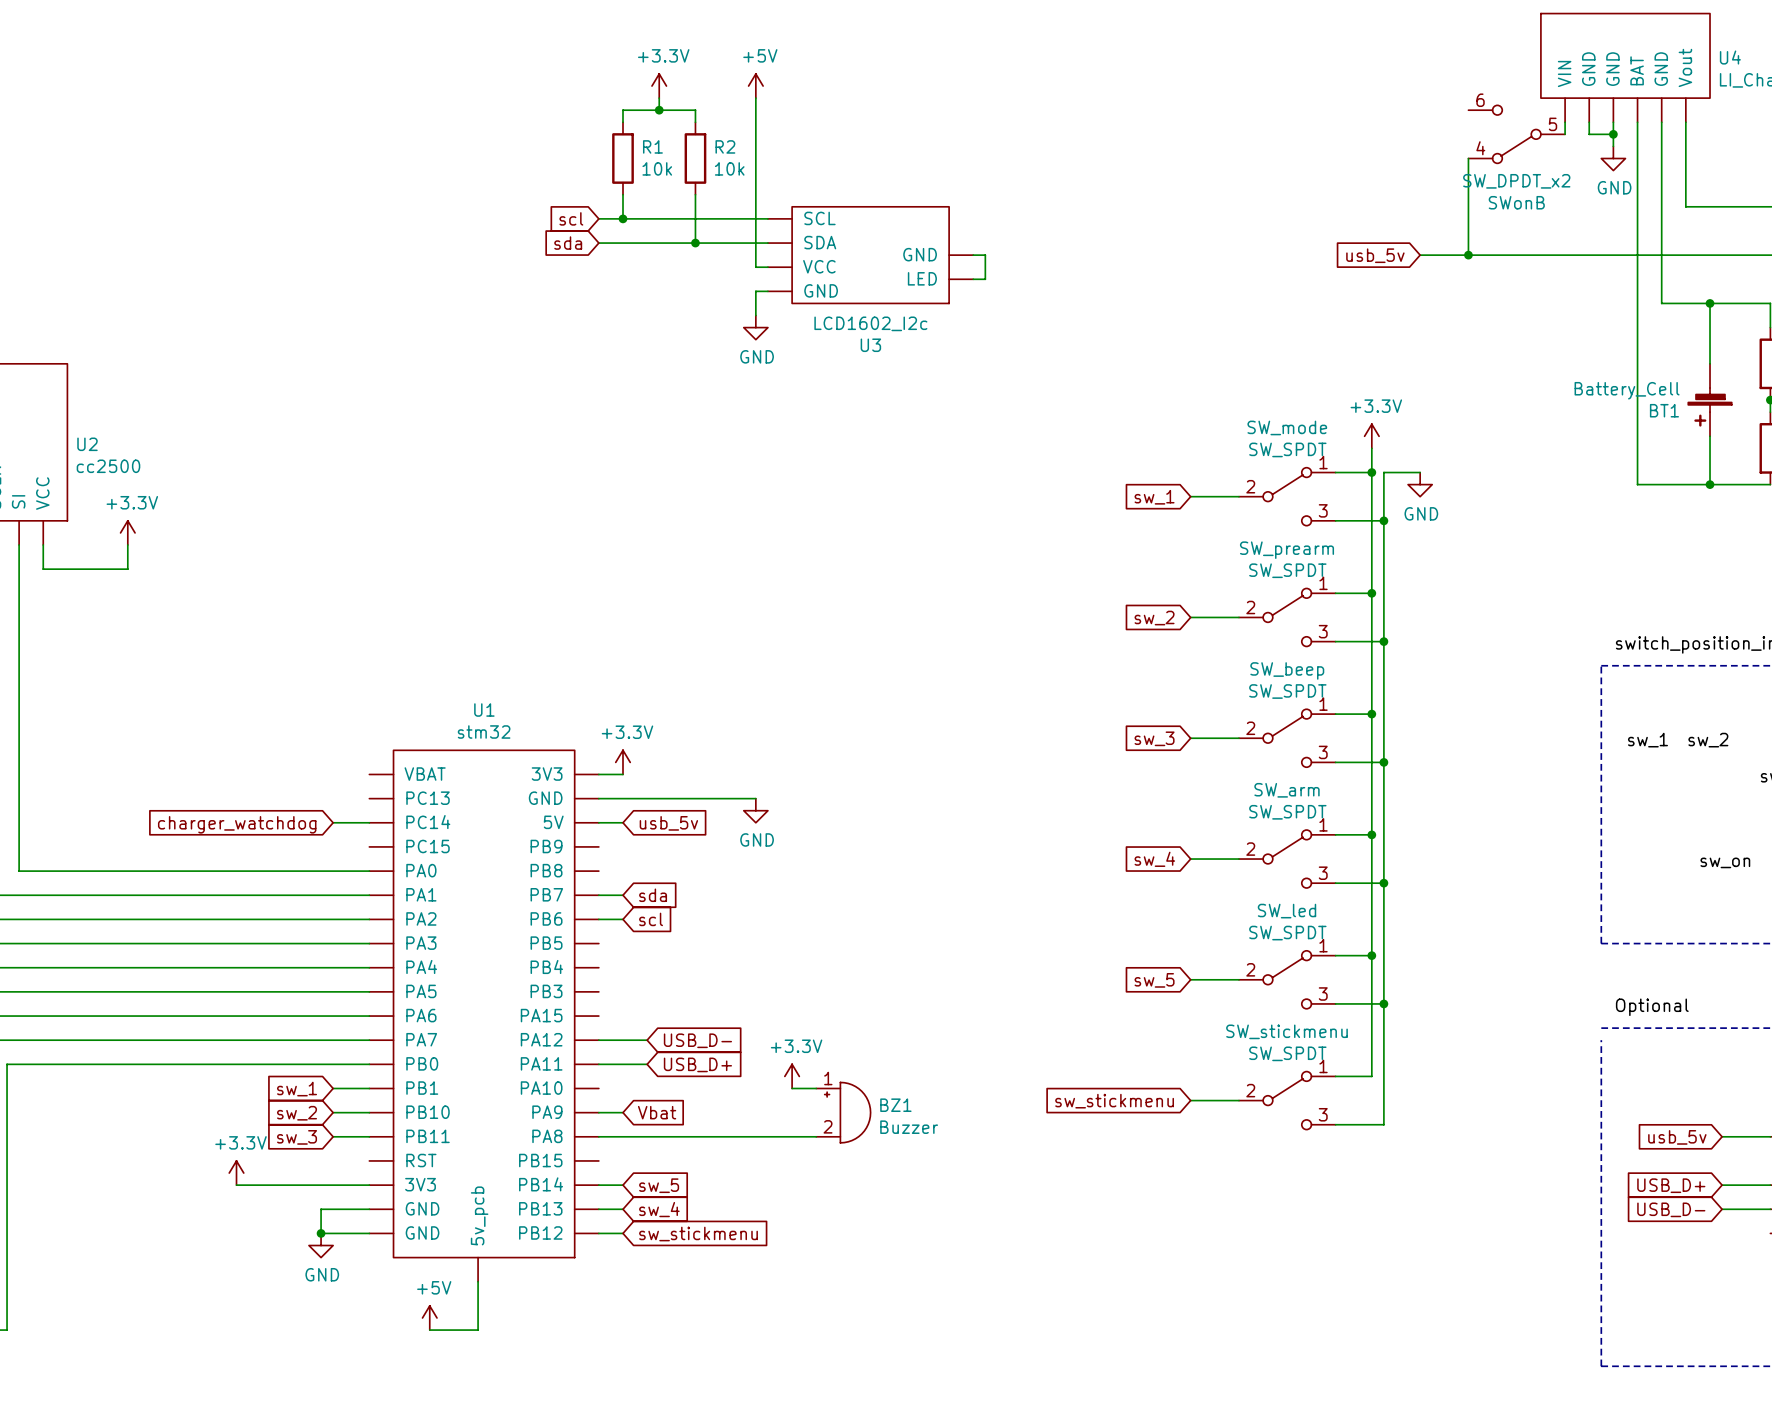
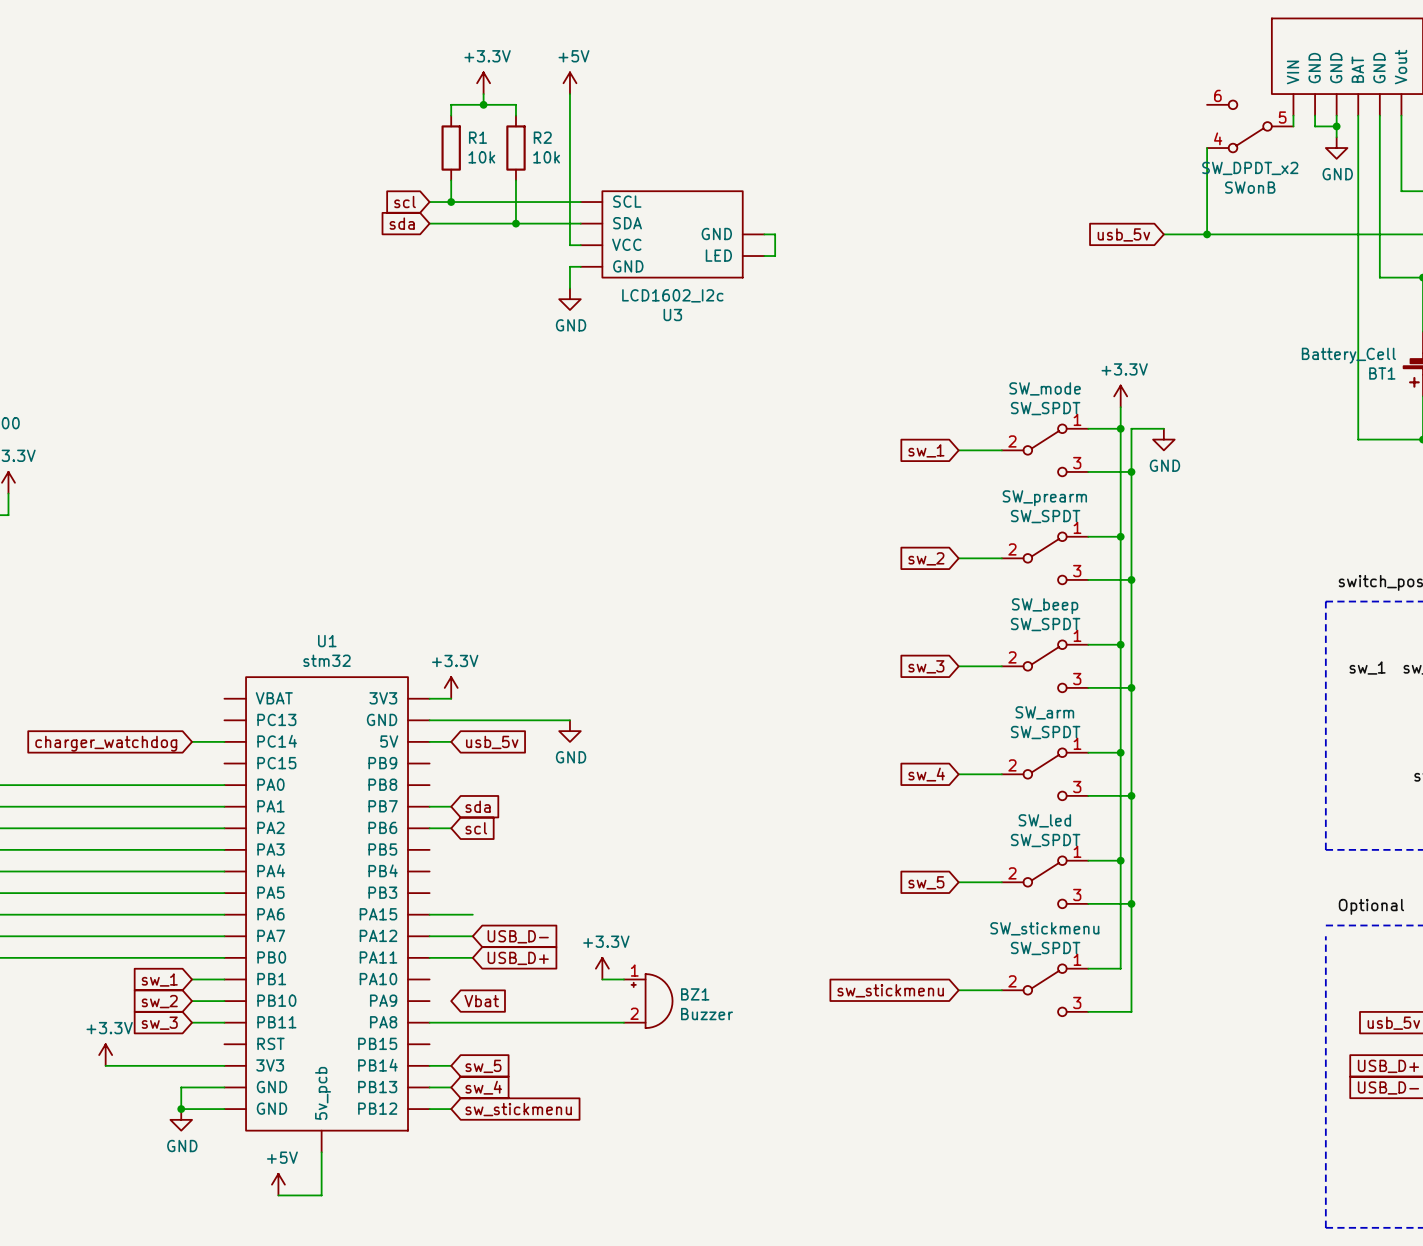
wire: none -> (429, 914) (472, 914)
wire: (598, 1112) (623, 1112) -> none

